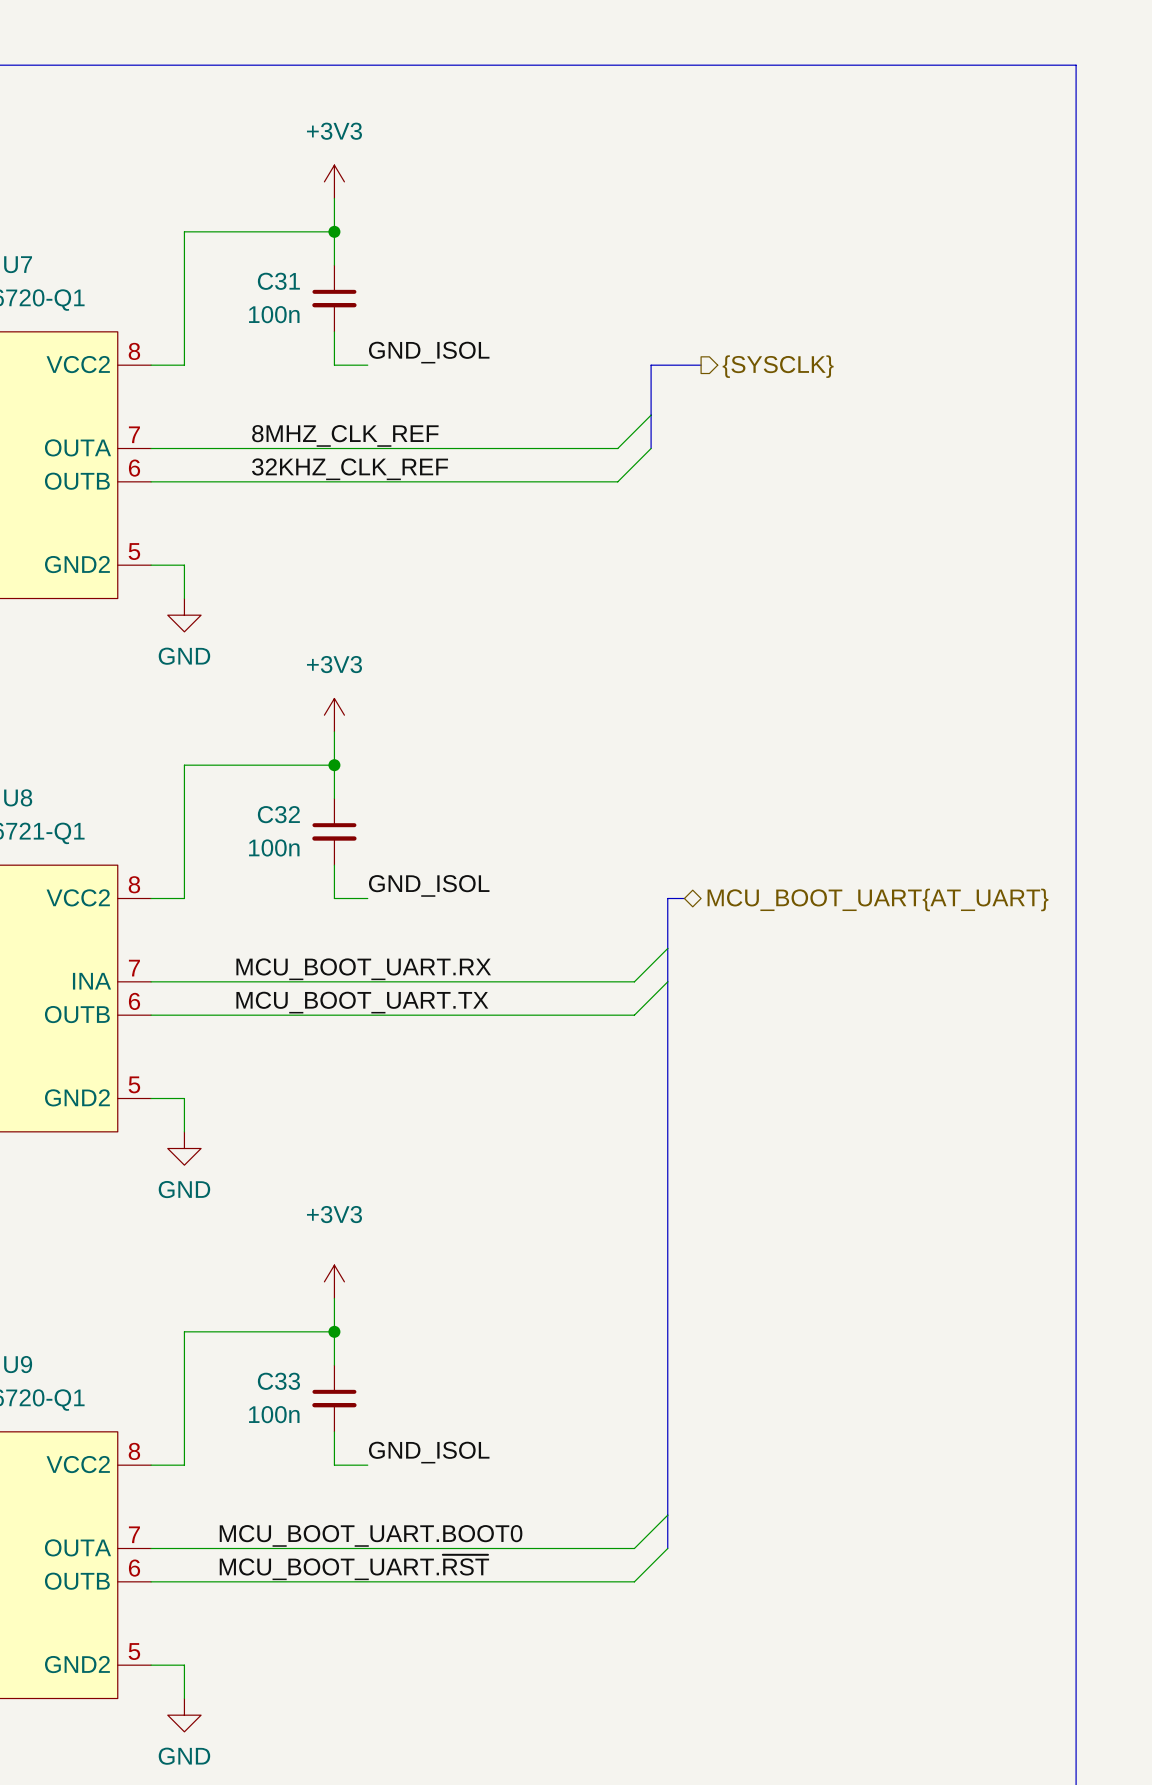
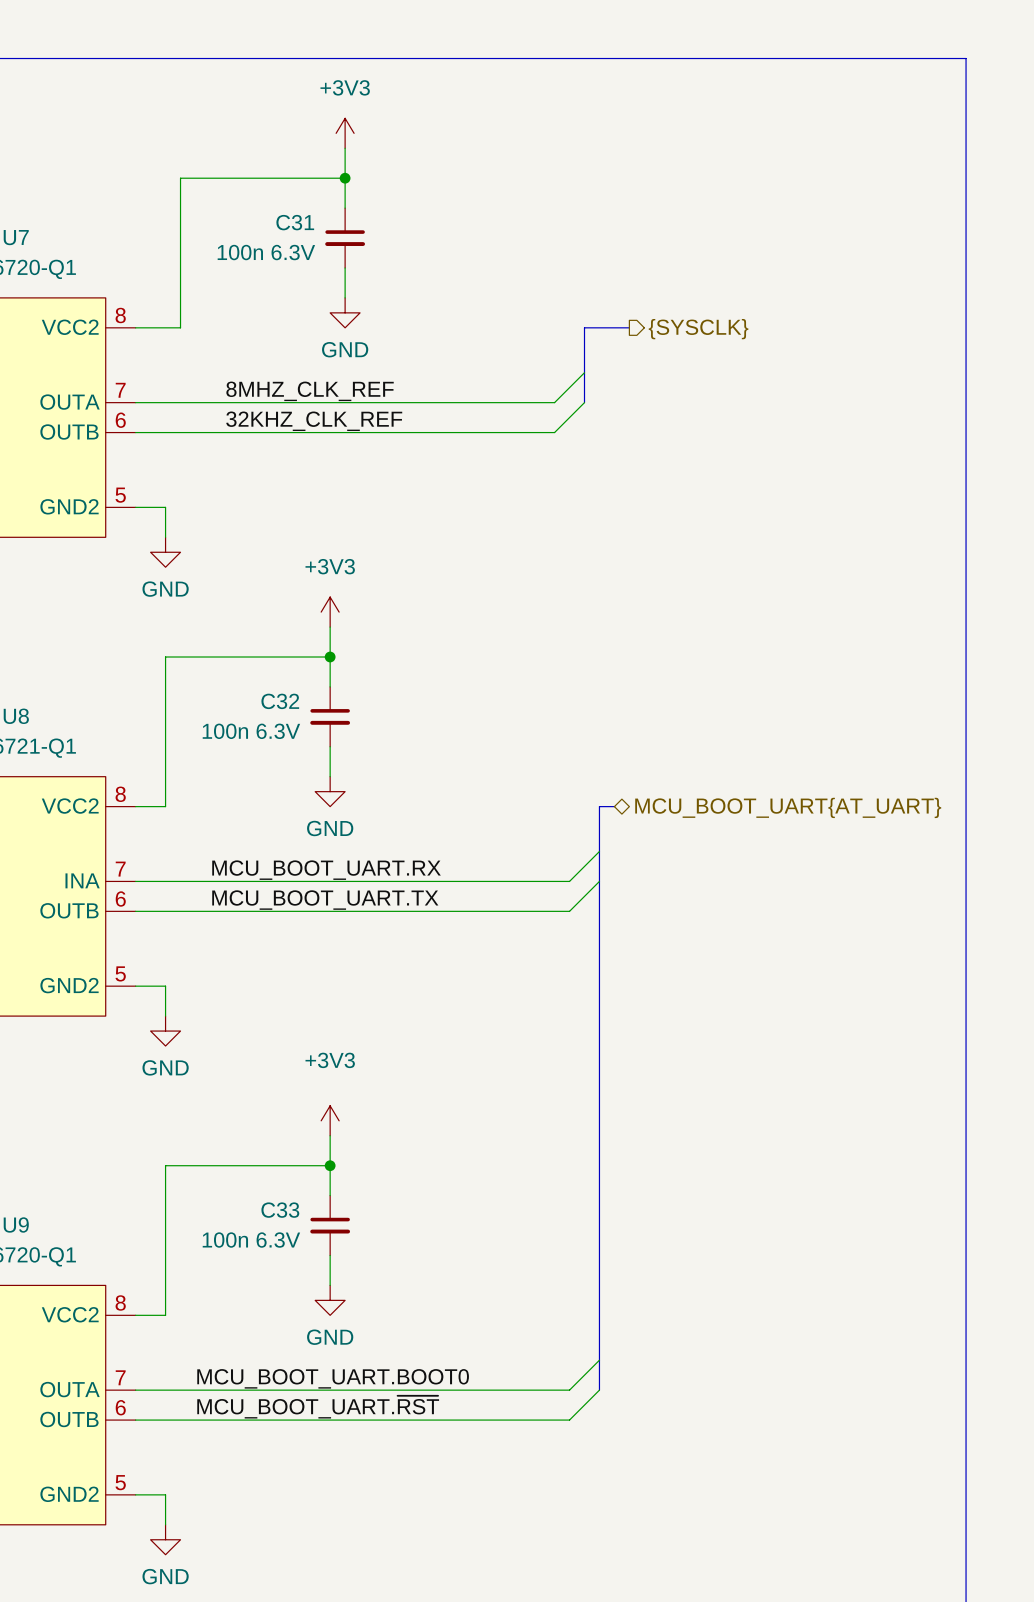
power symbol position: +3V3 (334, 181) -> +3V3 (345, 133)
wire: (334, 198) (334, 265) -> (345, 148) (345, 208)
wire: (334, 231) (184, 231) (184, 365) -> (345, 178) (180, 178) (180, 327) (165, 327)
junction position: (334, 231) -> (345, 178)
C31 position: (334, 298) -> (345, 238)
wire: none -> (345, 267) (345, 297)
C31 value: 100n (274, 314) -> 100n 6.3V (266, 252)
wire: (334, 331) (334, 365) (367, 365) -> none
power symbol: none -> GND (345, 312)
label: GND_ISOL (429, 352) -> none
power symbol position: +3V3 (334, 715) -> +3V3 (330, 612)
wire: (334, 731) (334, 798) -> (330, 627) (330, 686)
wire: (184, 765) (334, 765) -> (165, 686) (165, 657) (330, 657)
junction position: (334, 765) -> (330, 657)
C32 position: (334, 831) -> (330, 716)
wire: none -> (330, 746) (330, 776)
C32 value: 100n (274, 847) -> 100n 6.3V (251, 731)
wire: (334, 865) (334, 898) (367, 898) -> none
power symbol: none -> GND (330, 791)
label: GND_ISOL (429, 885) -> none
power symbol position: +3V3 (334, 1281) -> +3V3 (330, 1120)
wire: (334, 1298) (334, 1365) -> (330, 1135) (330, 1195)
wire: (184, 1331) (334, 1331) -> (165, 1195) (165, 1165) (330, 1165)
junction position: (334, 1331) -> (330, 1165)
C33 position: (334, 1398) -> (330, 1225)
wire: none -> (330, 1255) (330, 1285)
C33 value: 100n (274, 1414) -> 100n 6.3V (251, 1240)
wire: (334, 1431) (334, 1465) (367, 1465) -> none
power symbol: none -> GND (330, 1300)
label: GND_ISOL (429, 1452) -> none

